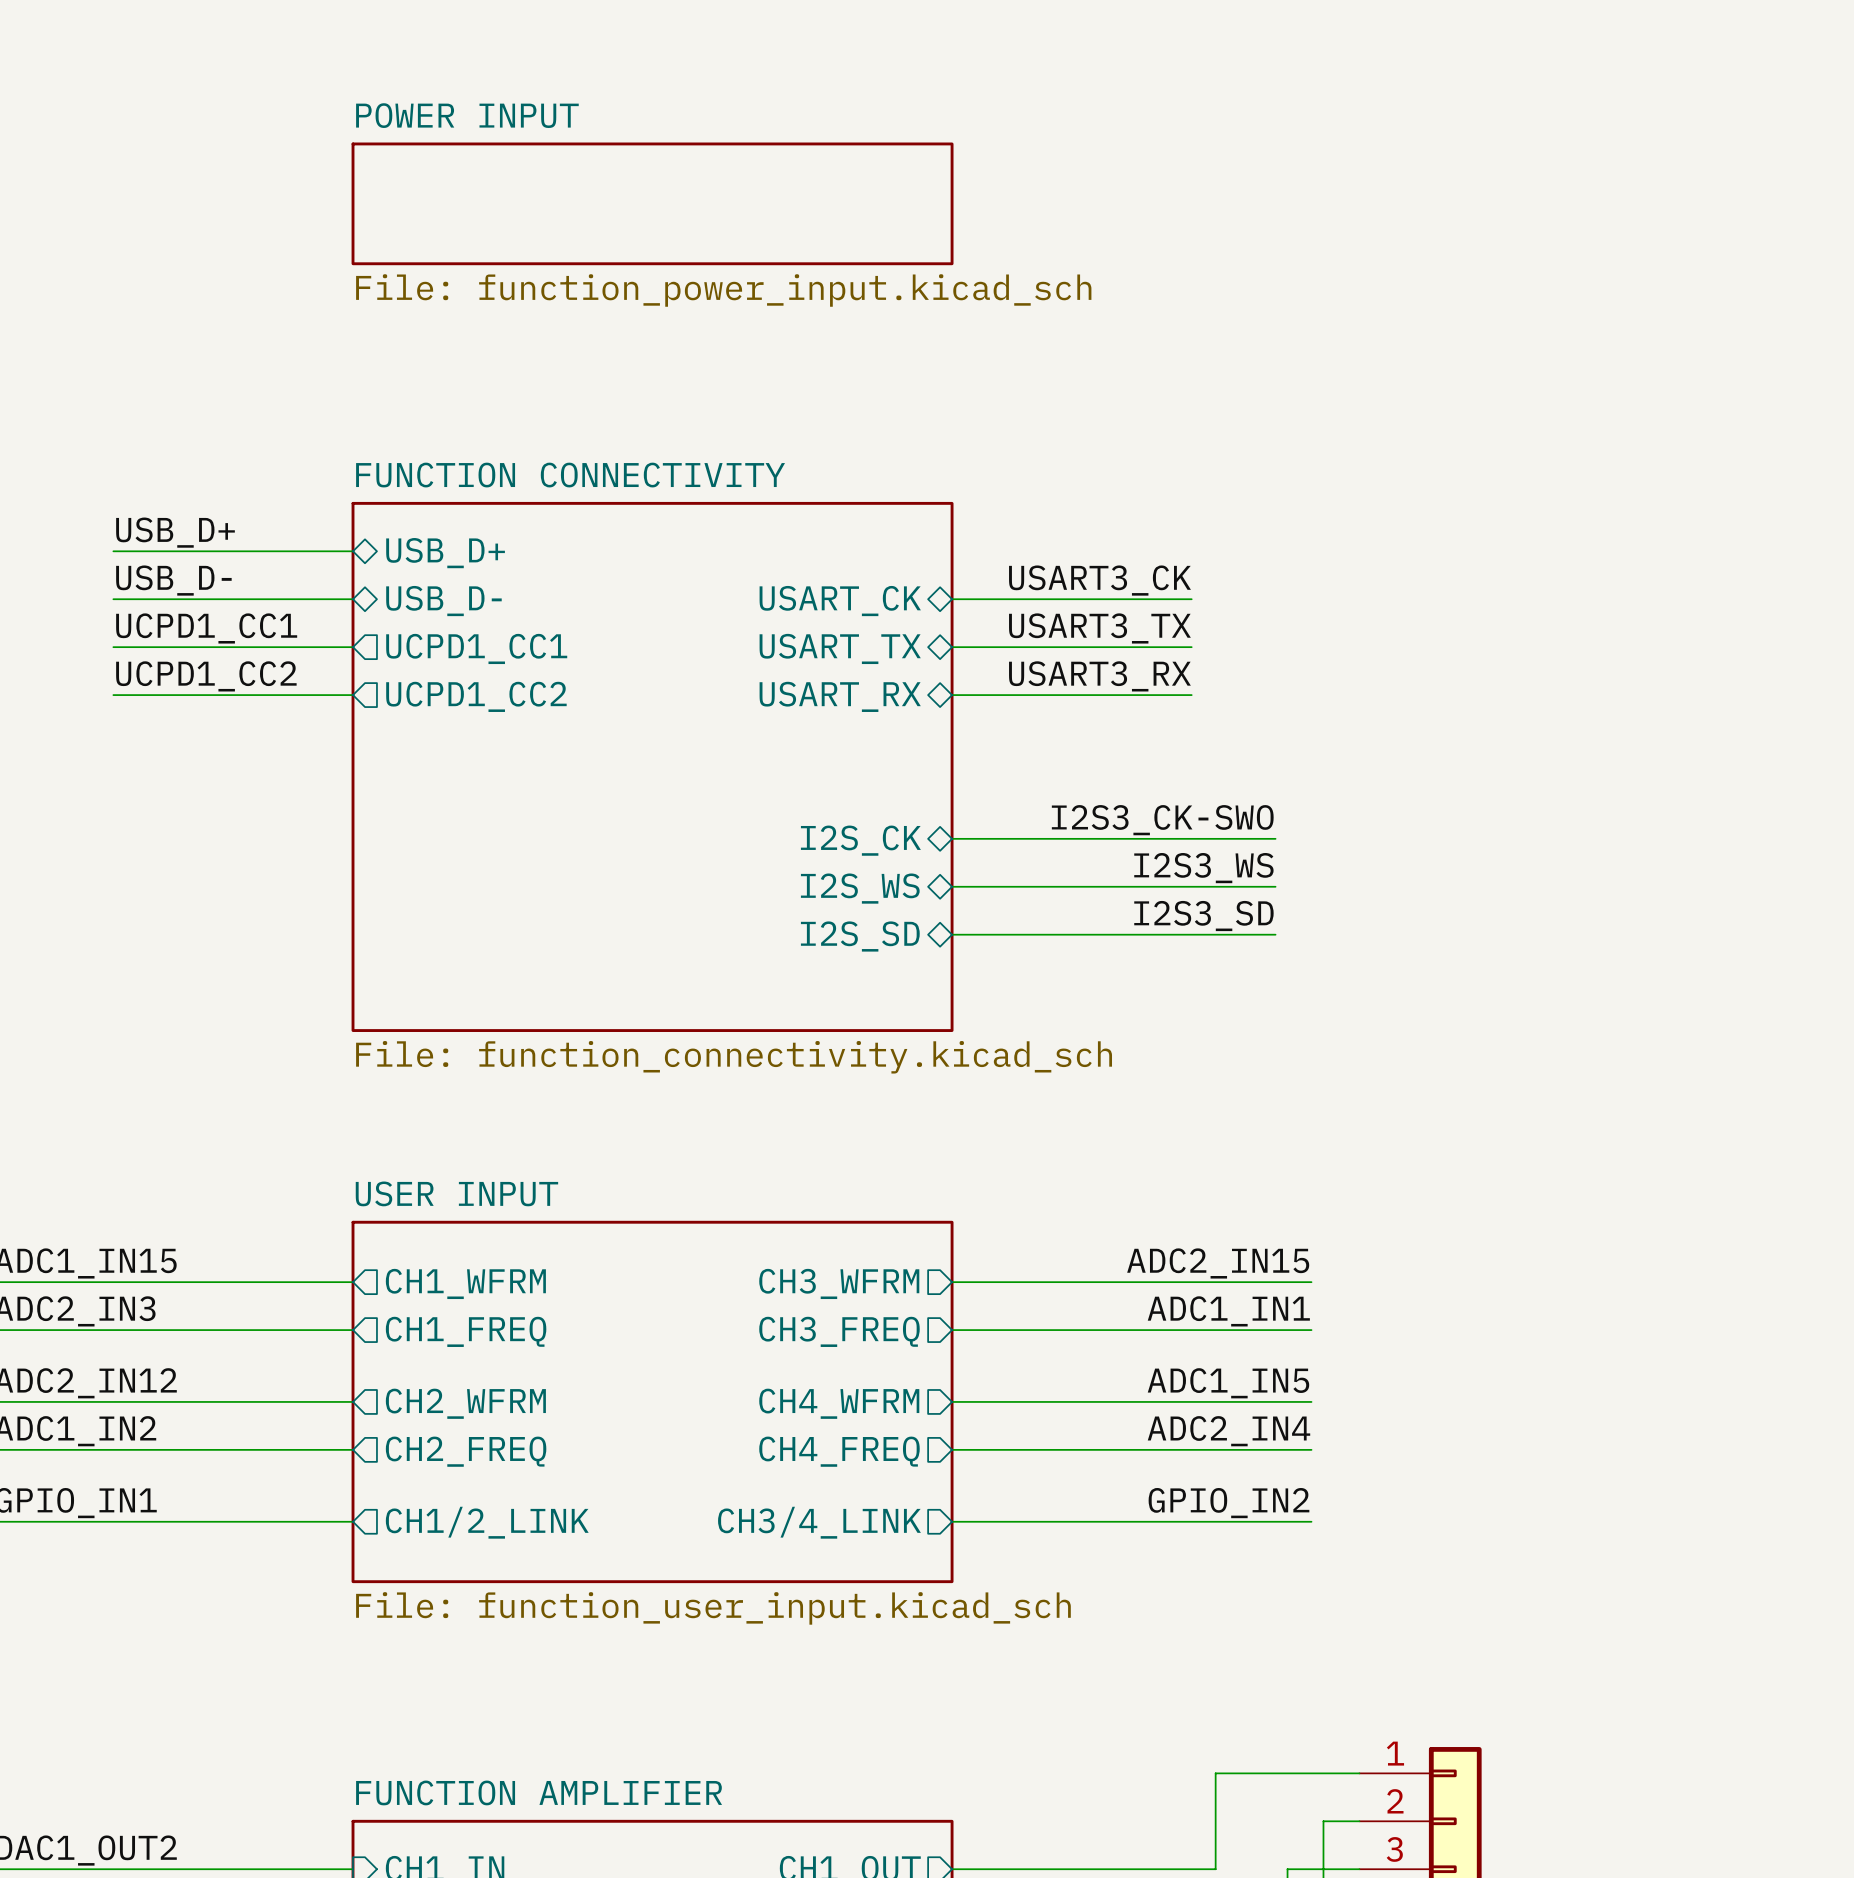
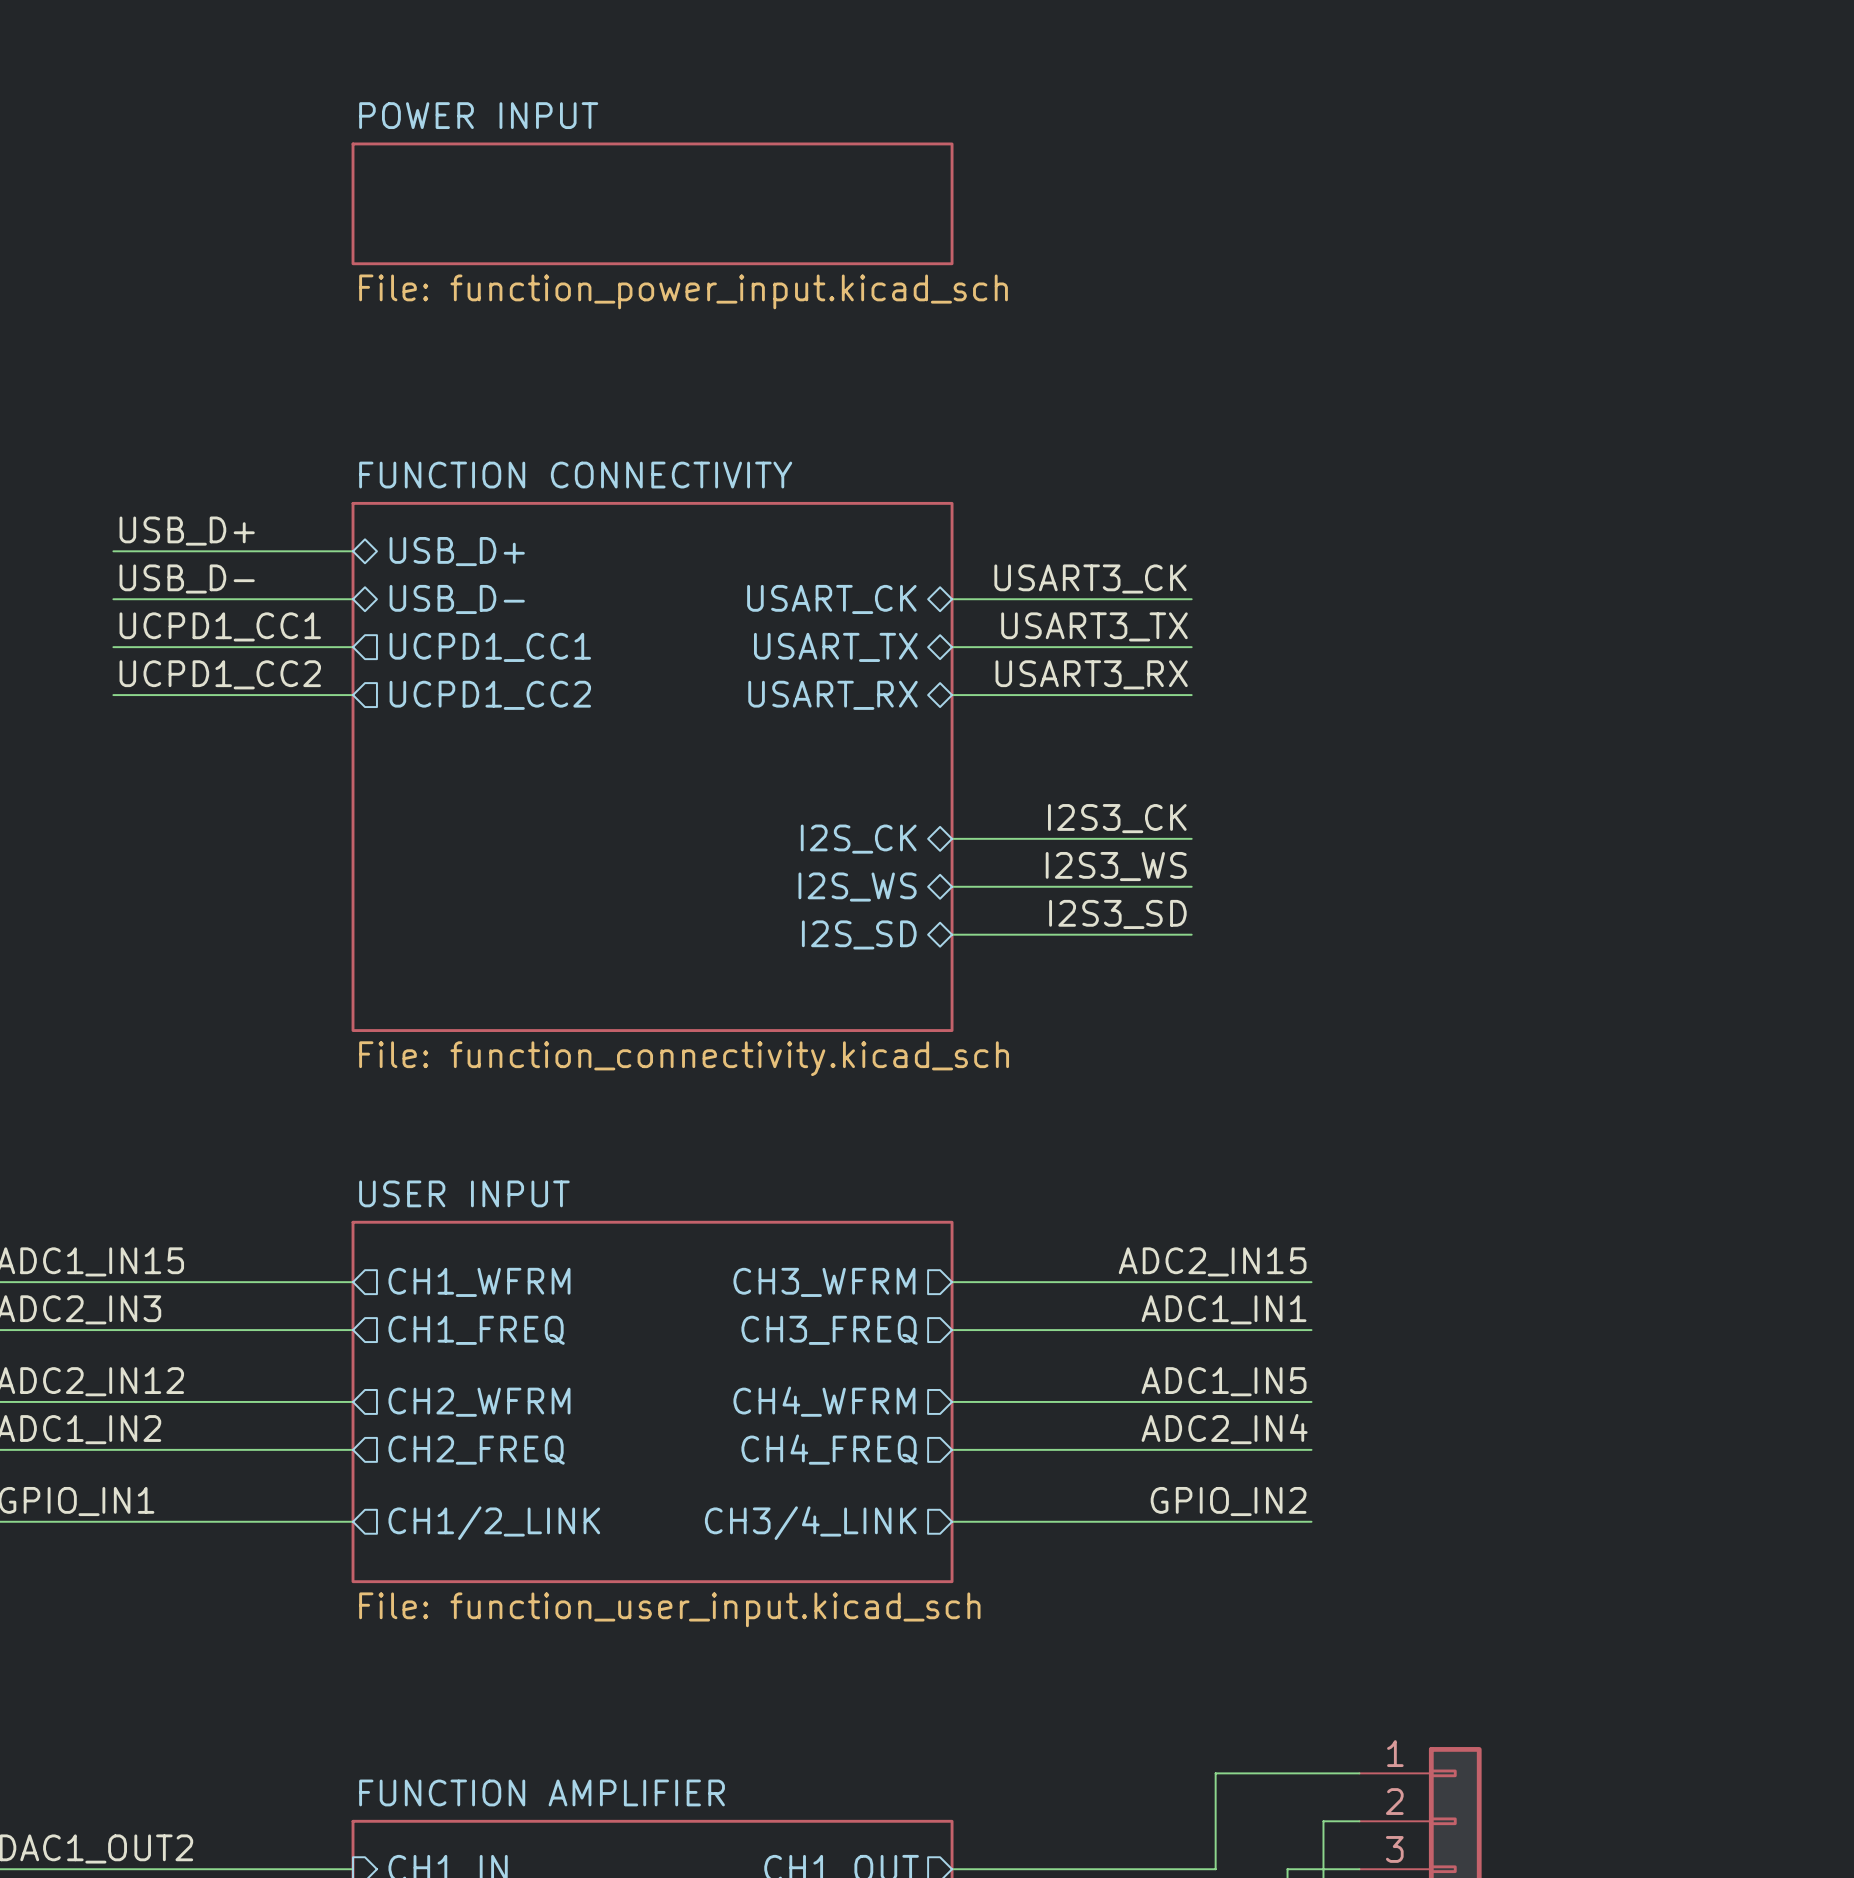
label: I2S3_CK-SWO (1162, 820) -> I2S3_CK (1117, 818)
wire: (1191, 838) (1275, 838) -> none
label position: I2S3_WS (1203, 868) -> I2S3_WS (1116, 866)
wire: (1191, 886) (1275, 886) -> none
label position: I2S3_SD (1203, 916) -> I2S3_SD (1117, 914)
wire: (1191, 934) (1275, 934) -> none

